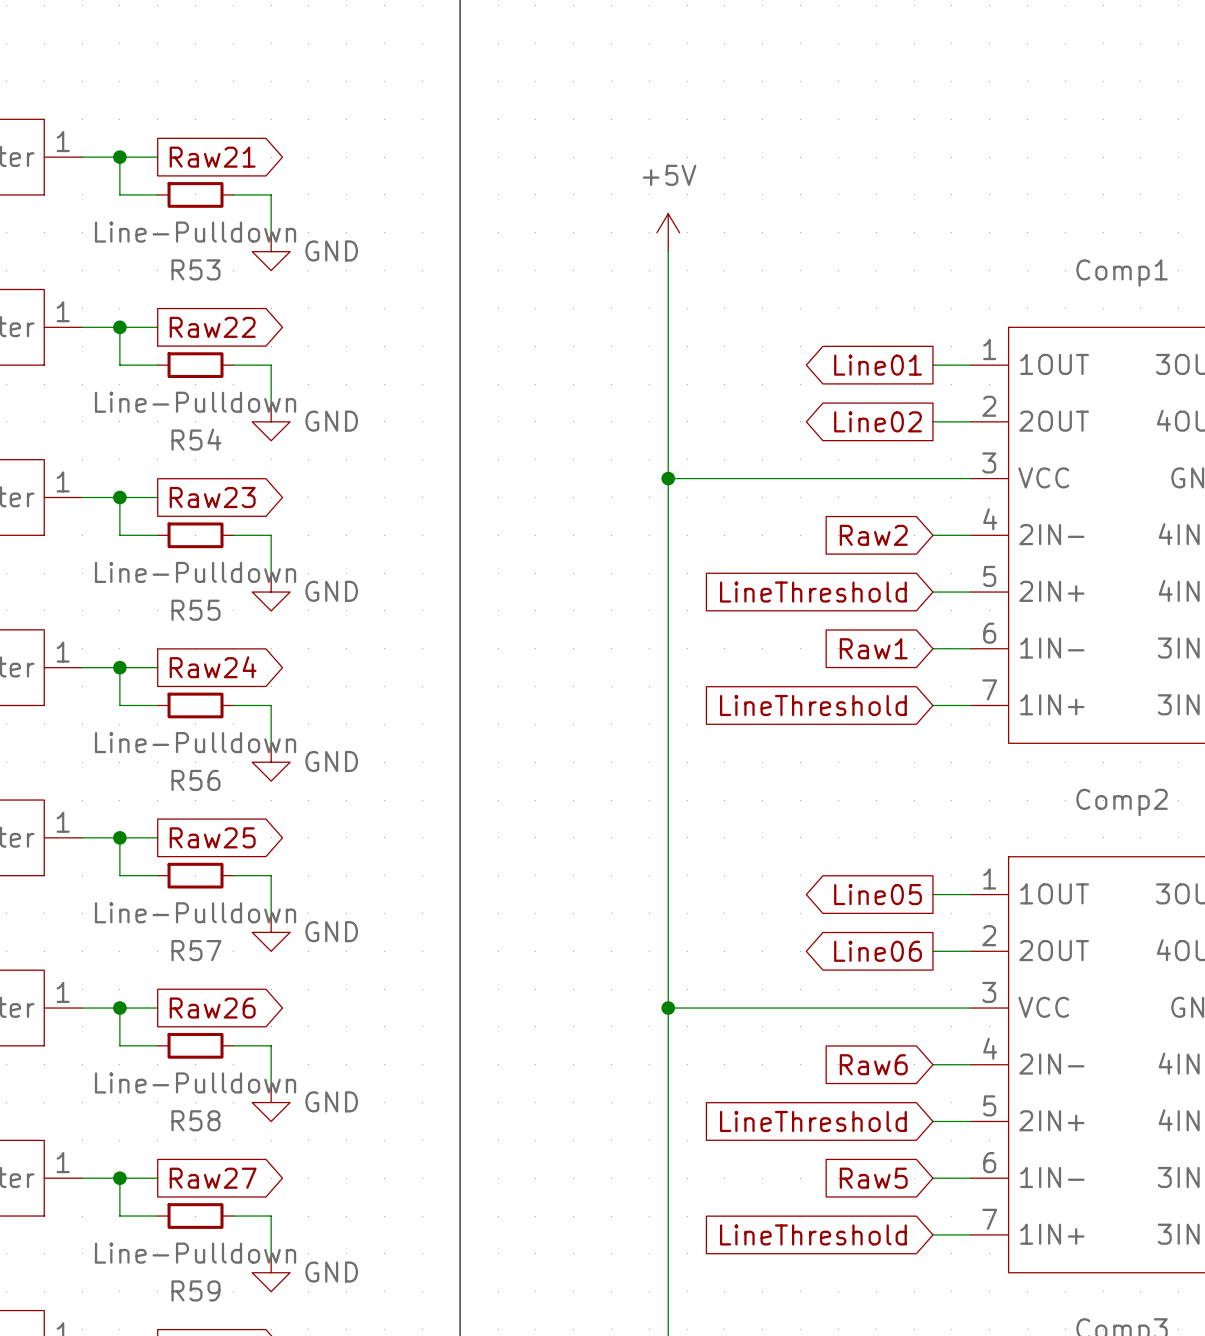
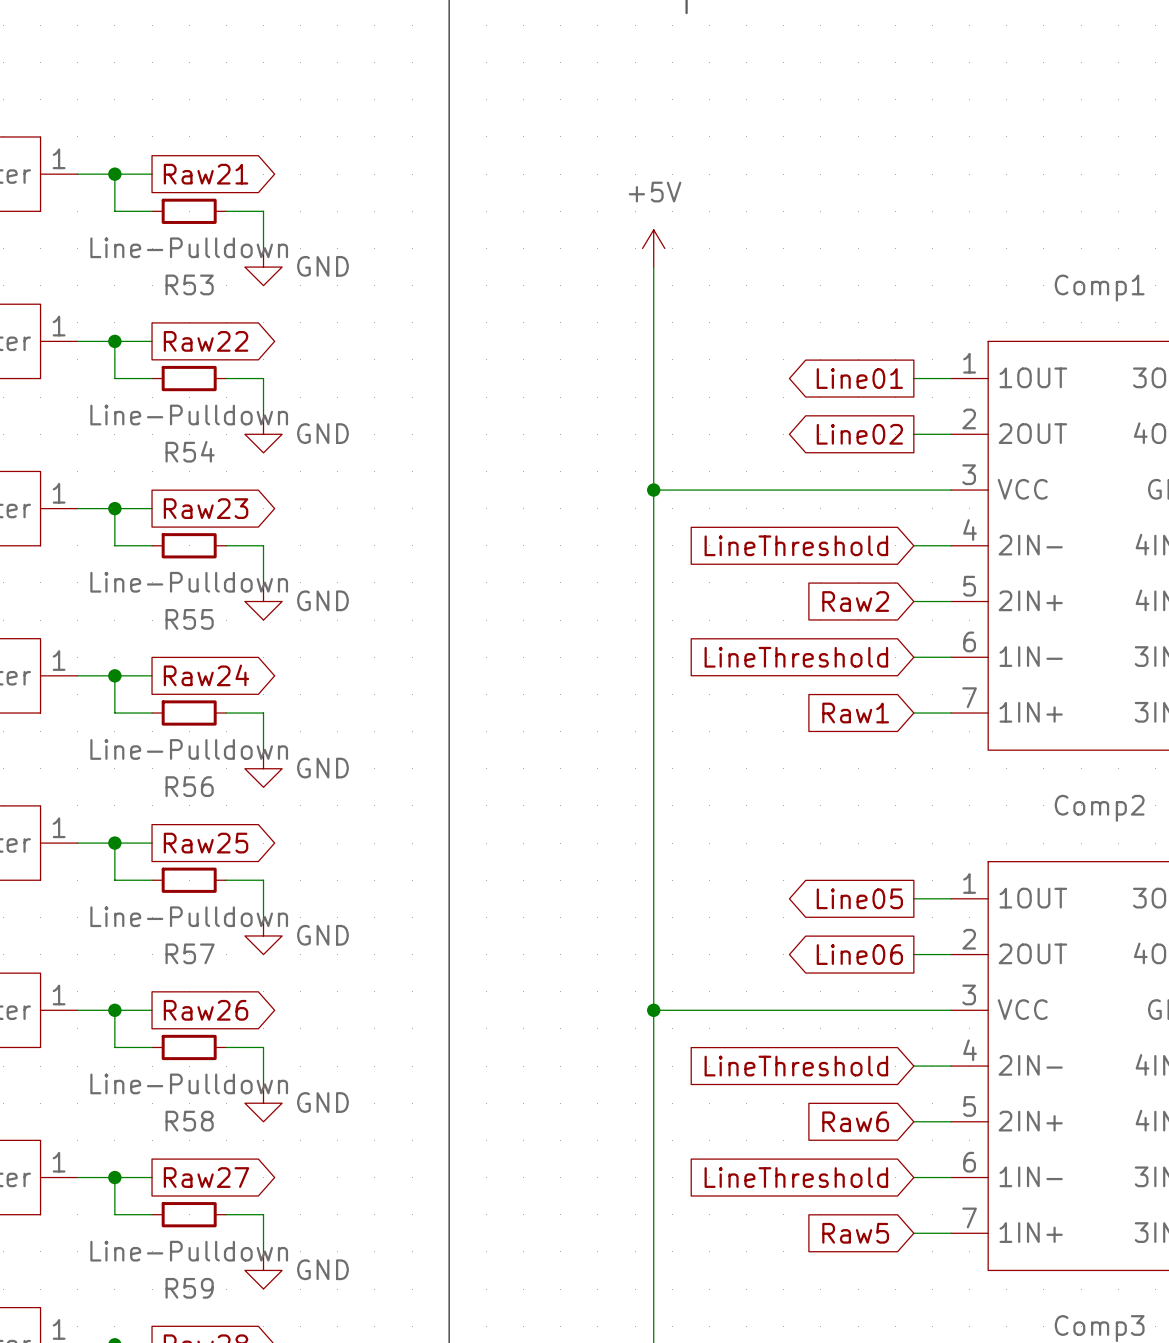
global label: Raw2 (873, 535) -> LineThreshold (796, 545)
global label: LineThreshold (813, 592) -> Raw2 (855, 601)
global label: Raw1 (873, 648) -> LineThreshold (796, 657)
global label: LineThreshold (813, 705) -> Raw1 (855, 713)
global label: Raw6 (873, 1064) -> LineThreshold (796, 1066)
global label: LineThreshold (813, 1121) -> Raw6 (855, 1121)
global label: Raw5 (873, 1178) -> LineThreshold (796, 1177)
global label: LineThreshold (813, 1234) -> Raw5 (855, 1233)

